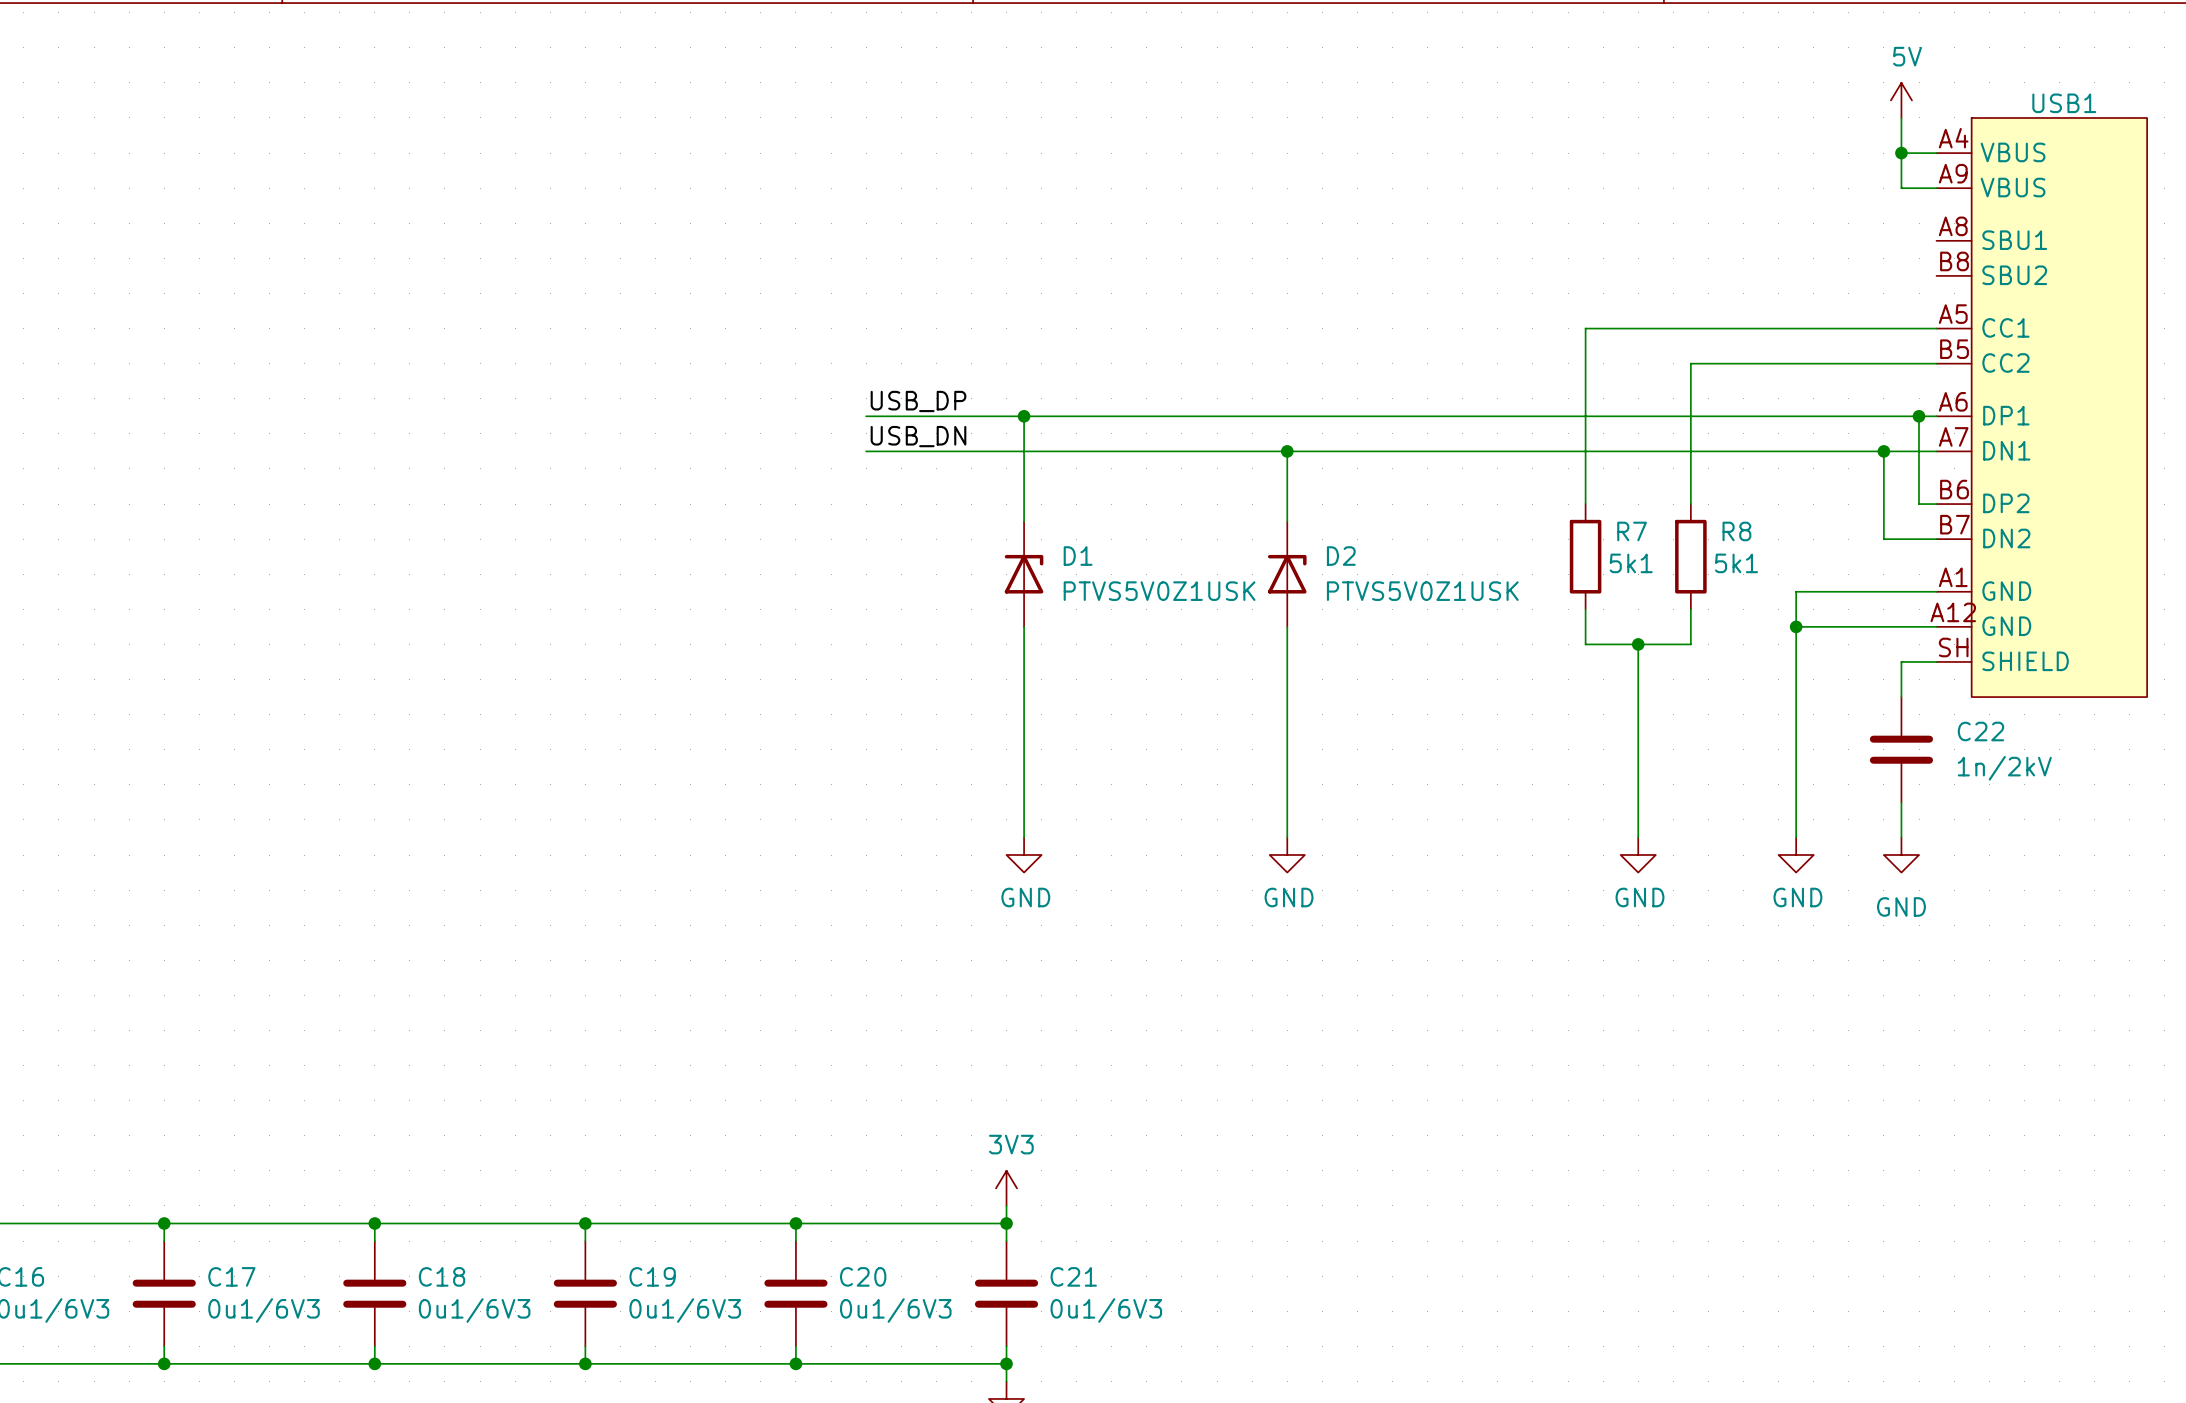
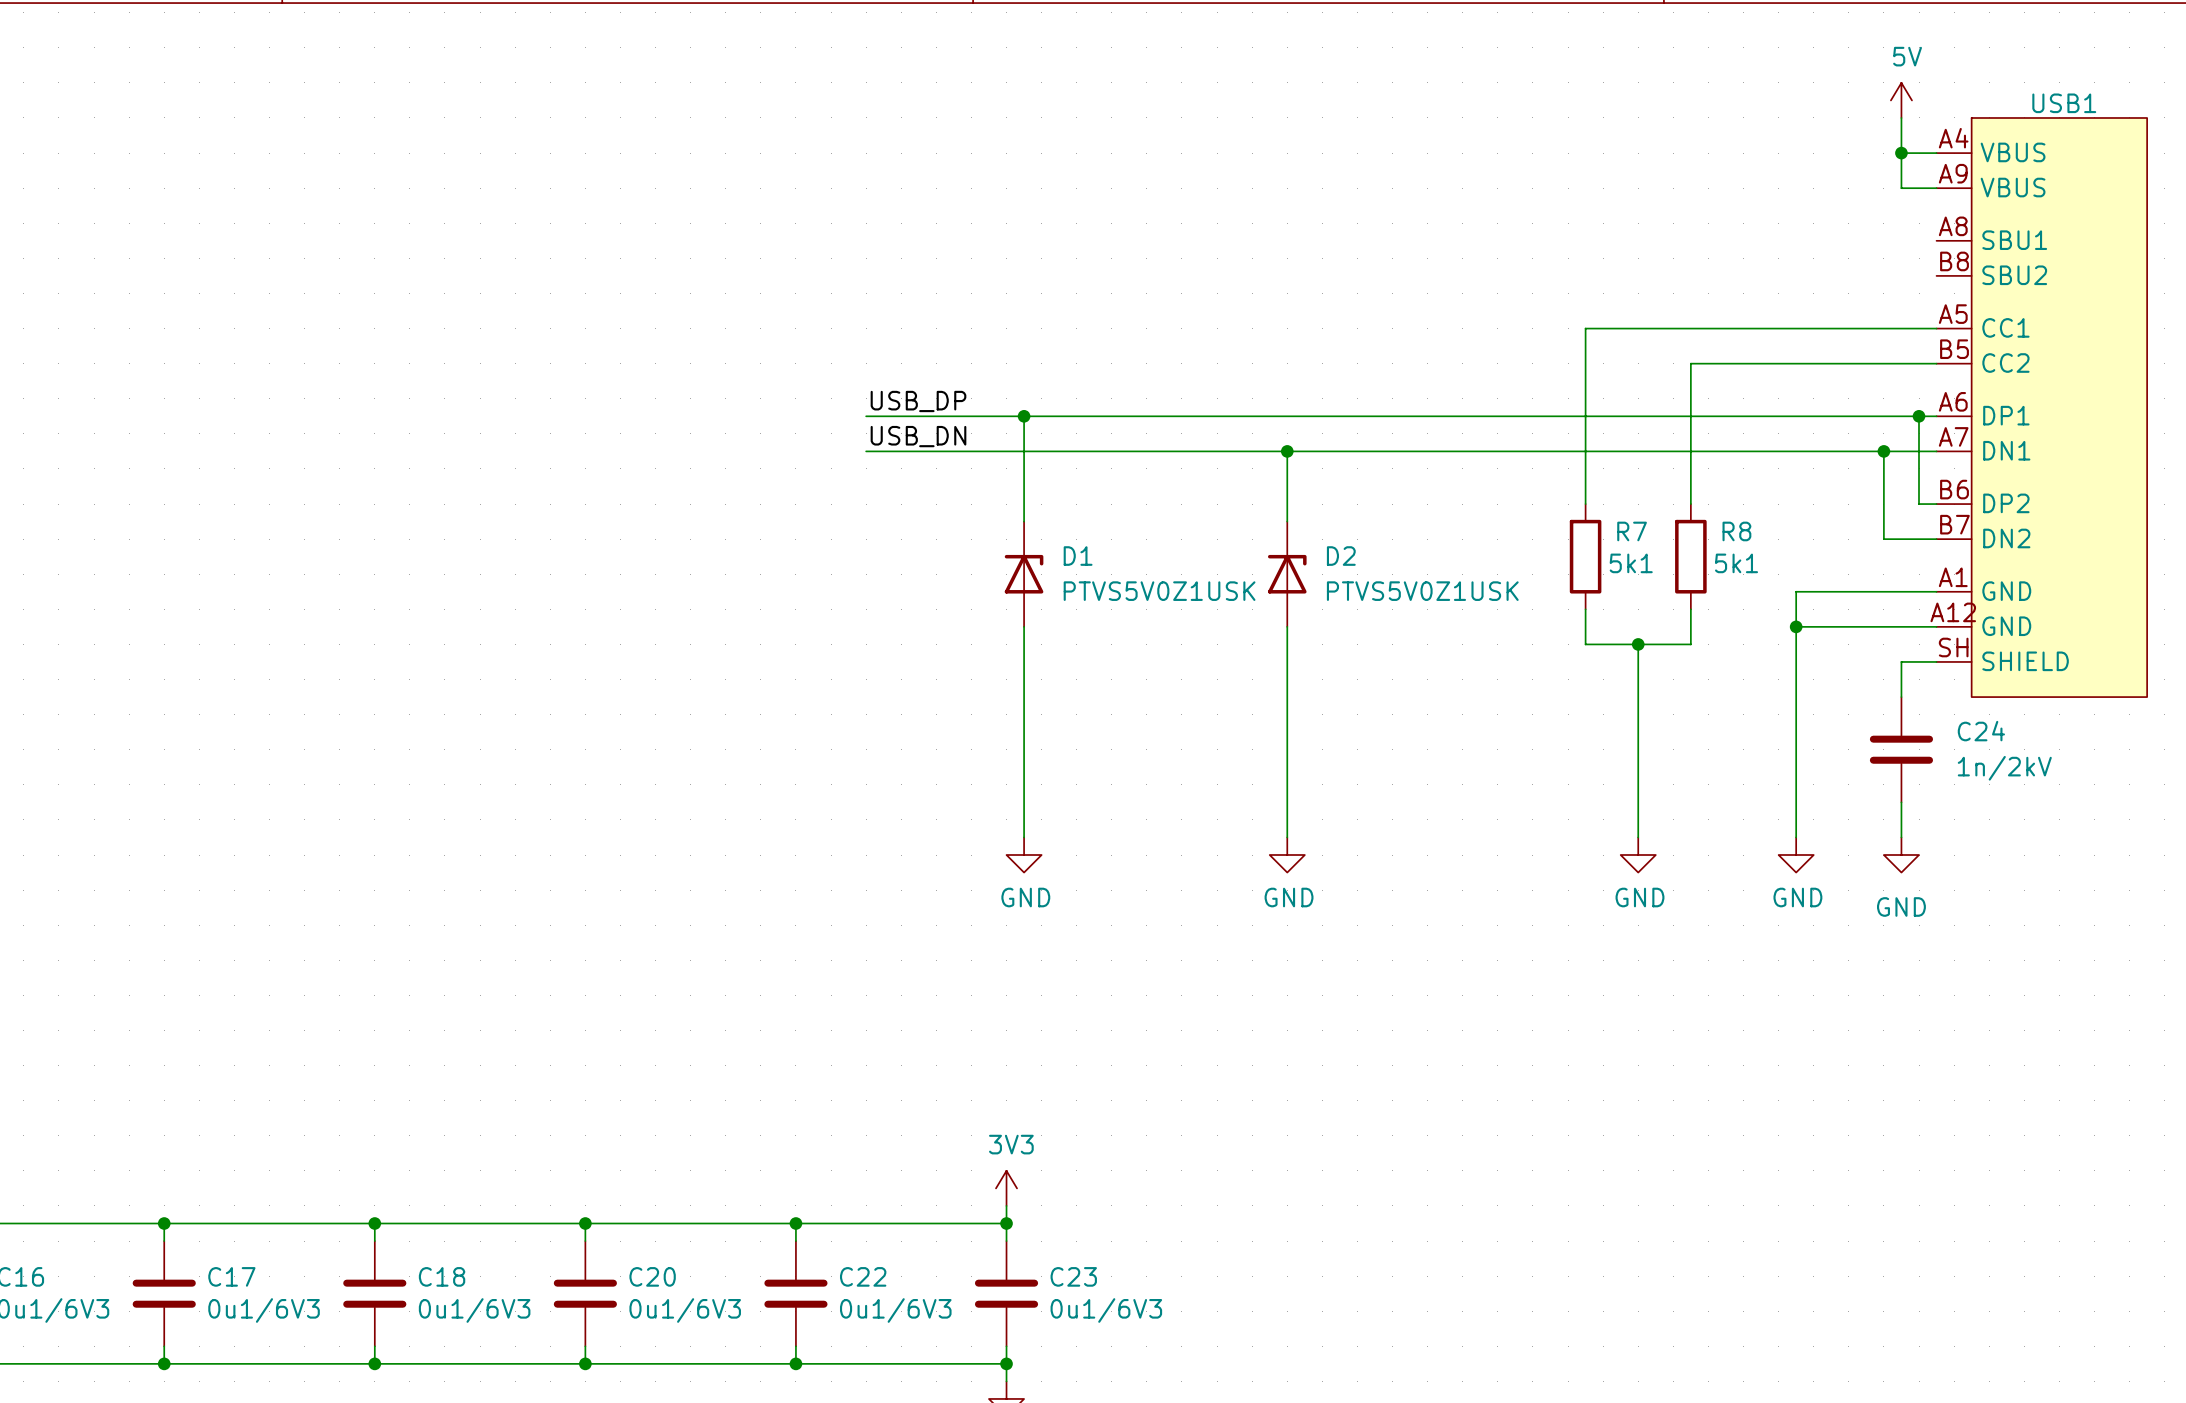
C22 name: C22 (1980, 731) -> C24 (1981, 731)
C19 name: C19 (652, 1276) -> C20 (652, 1276)
C20 name: C20 (863, 1276) -> C22 (863, 1276)
C21 name: C21 (1073, 1276) -> C23 (1073, 1276)

